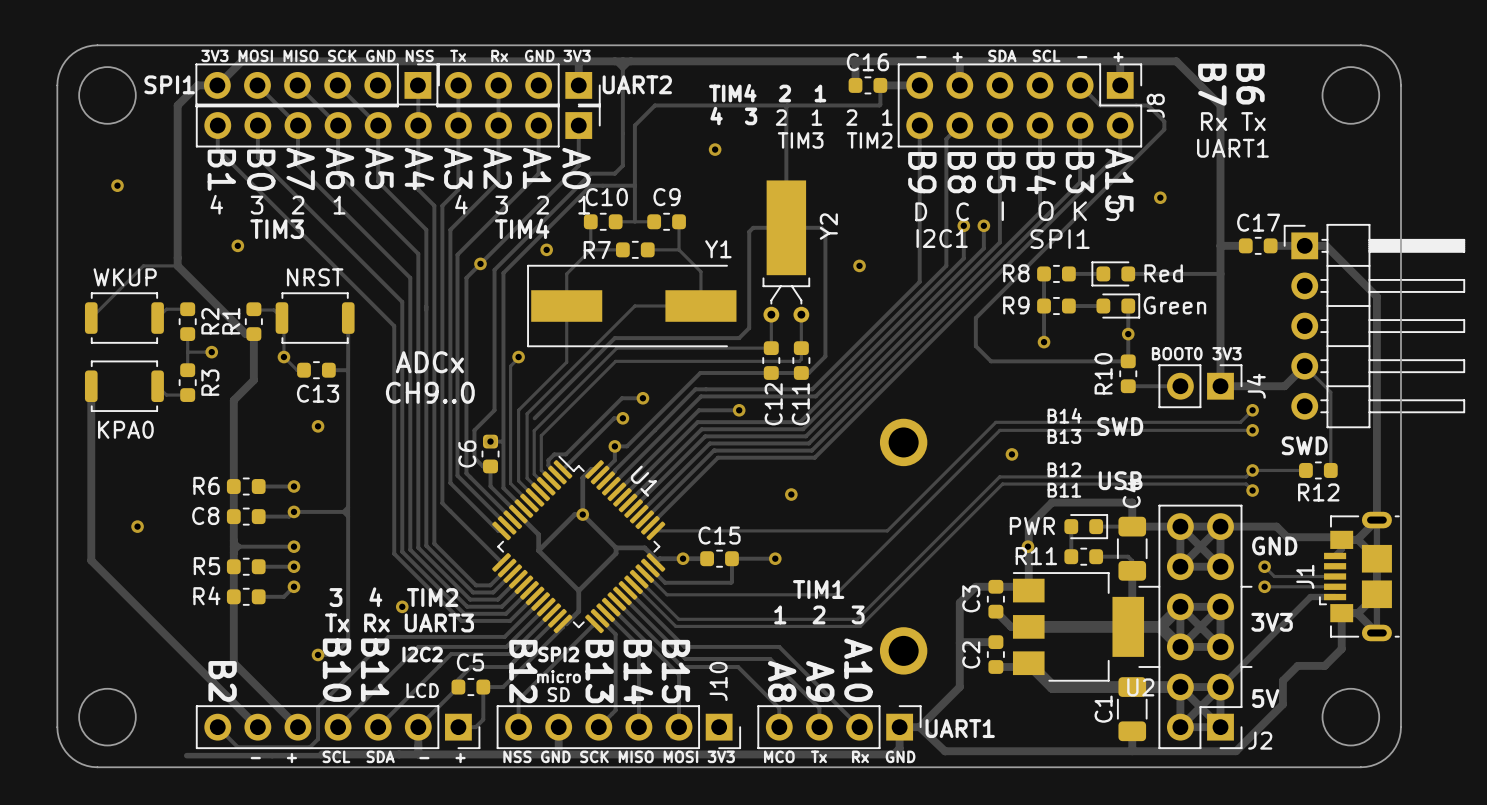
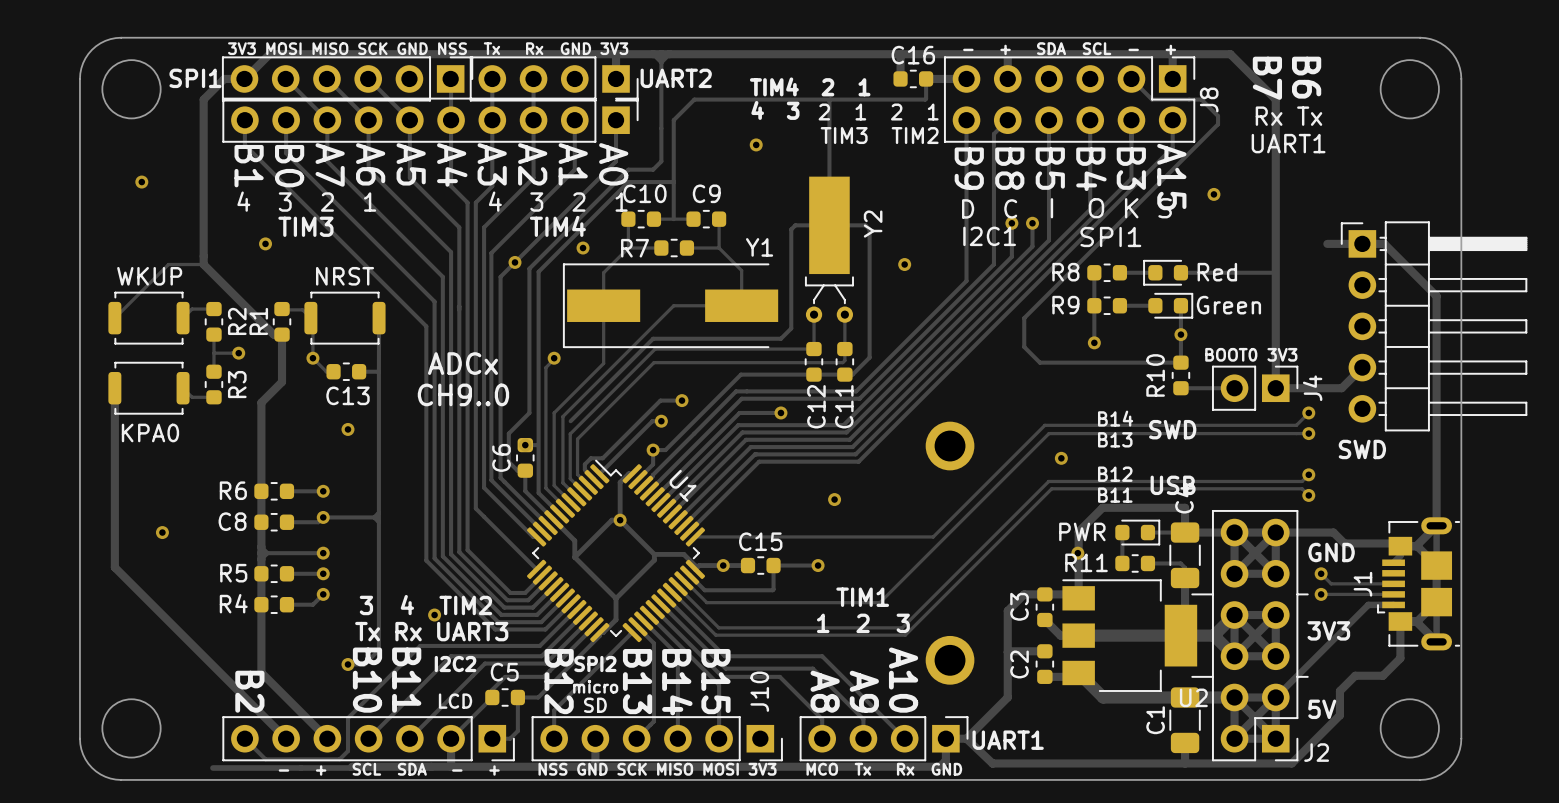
track: (1220, 245) (1245, 245) -> none
C17: (1258, 245) -> none
track: (1304, 366) (1330, 392) (1330, 470) -> none
track: (1252, 470) (1305, 470) -> none
R12: (1318, 470) -> none

